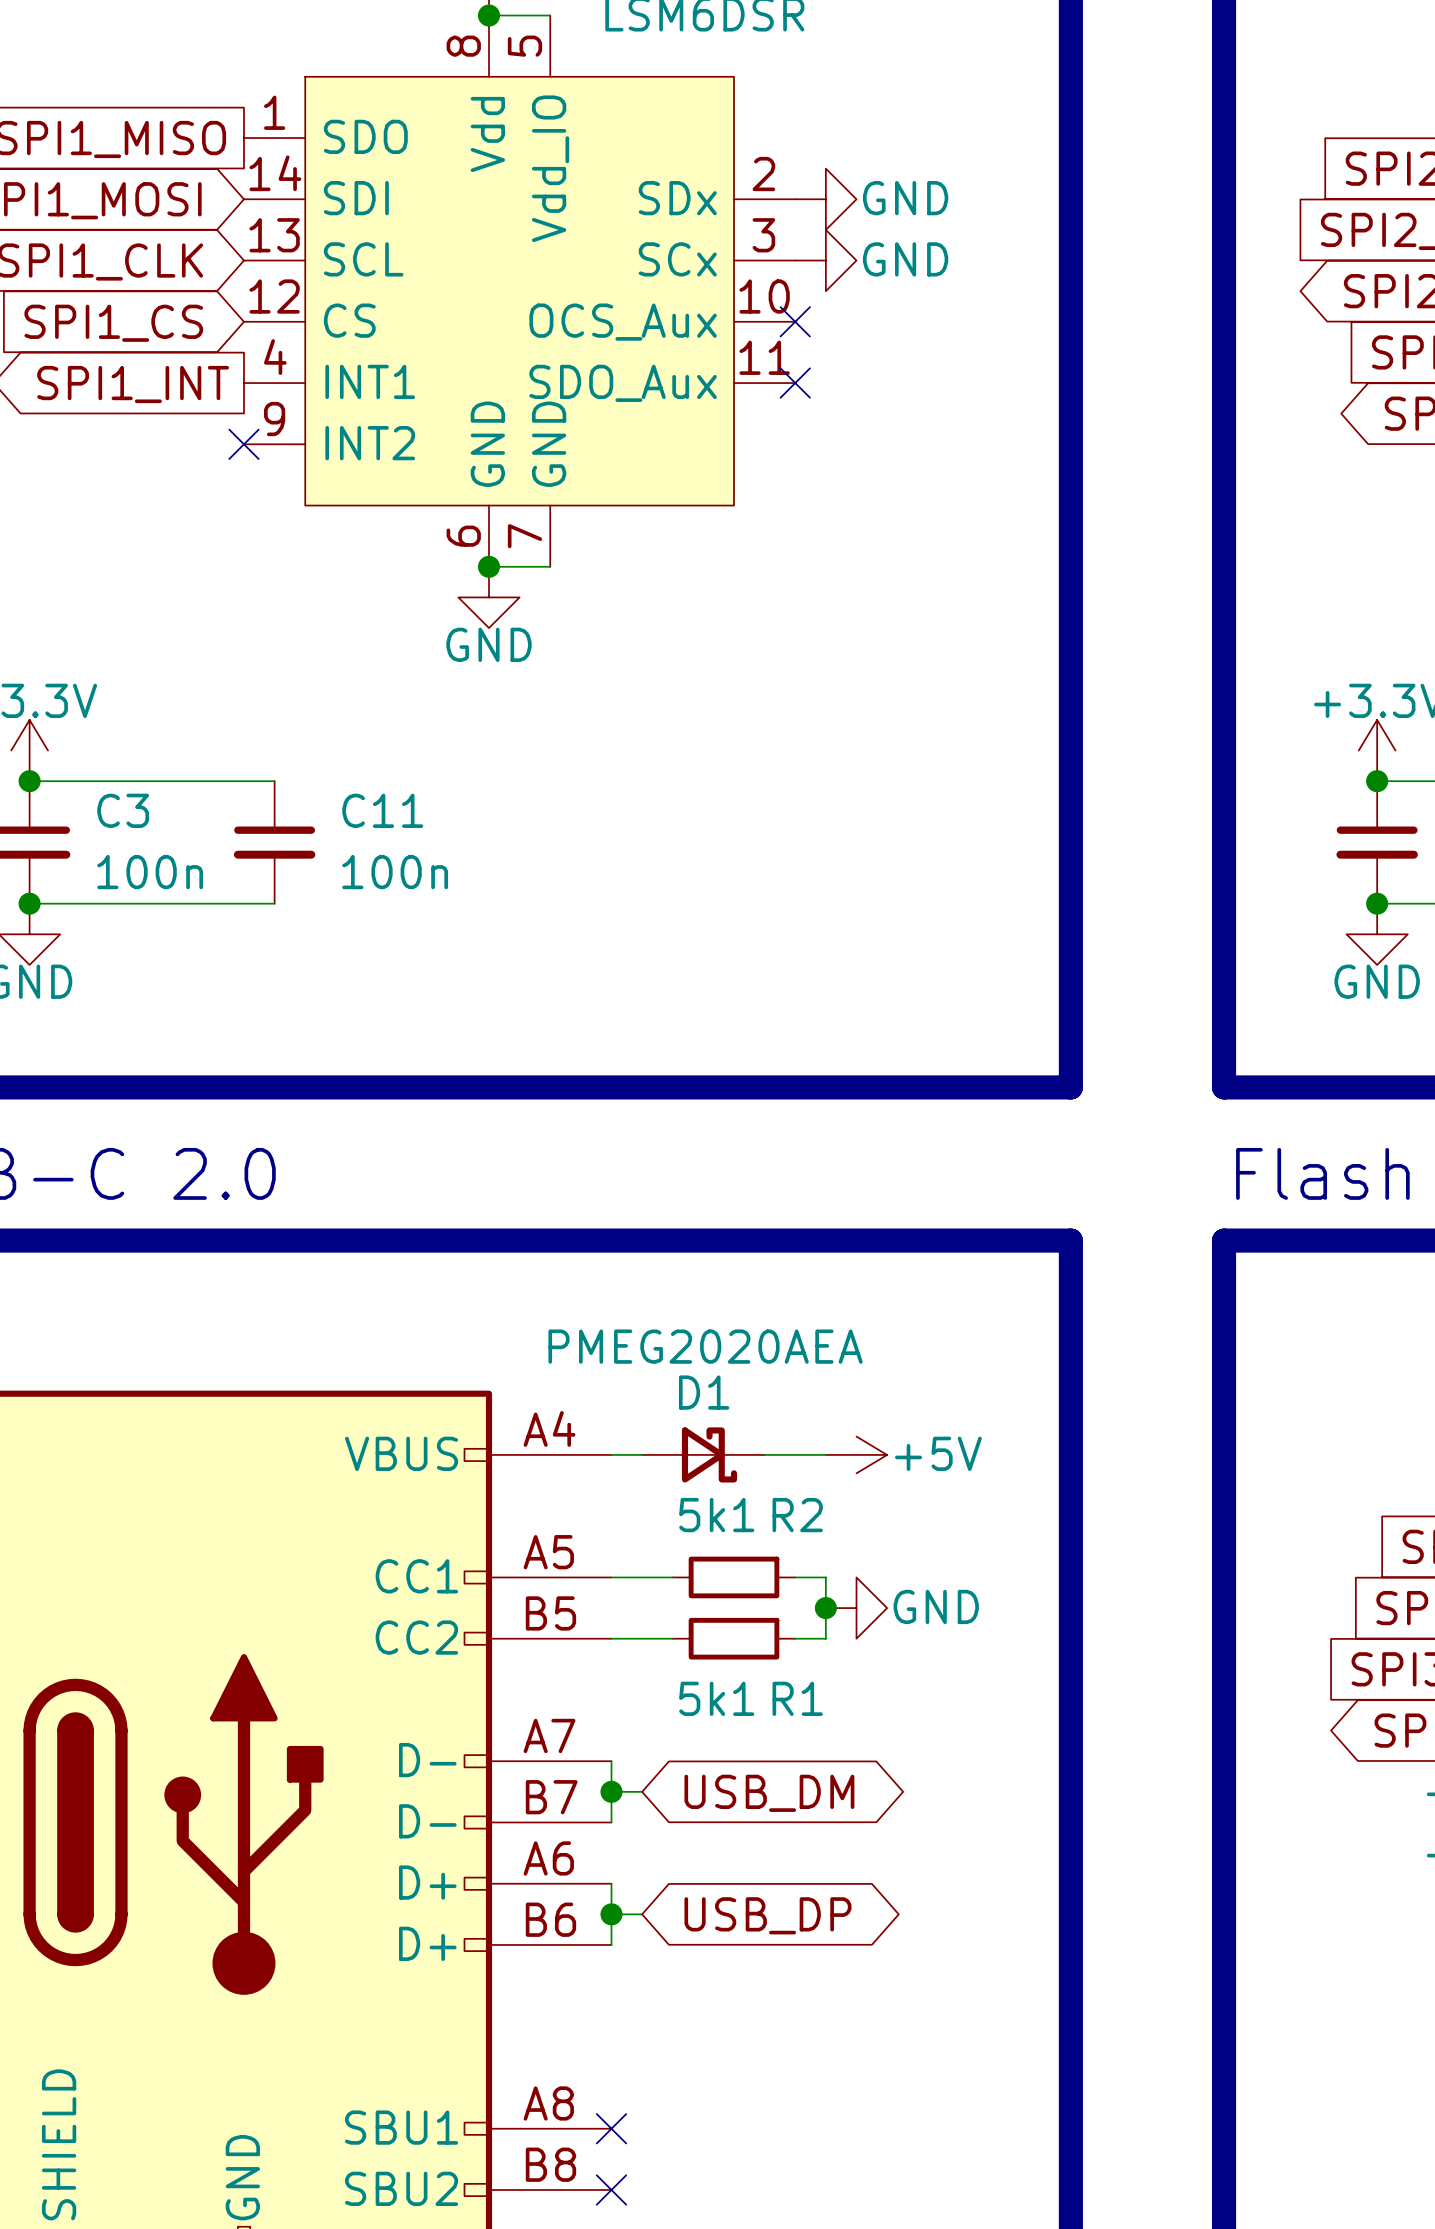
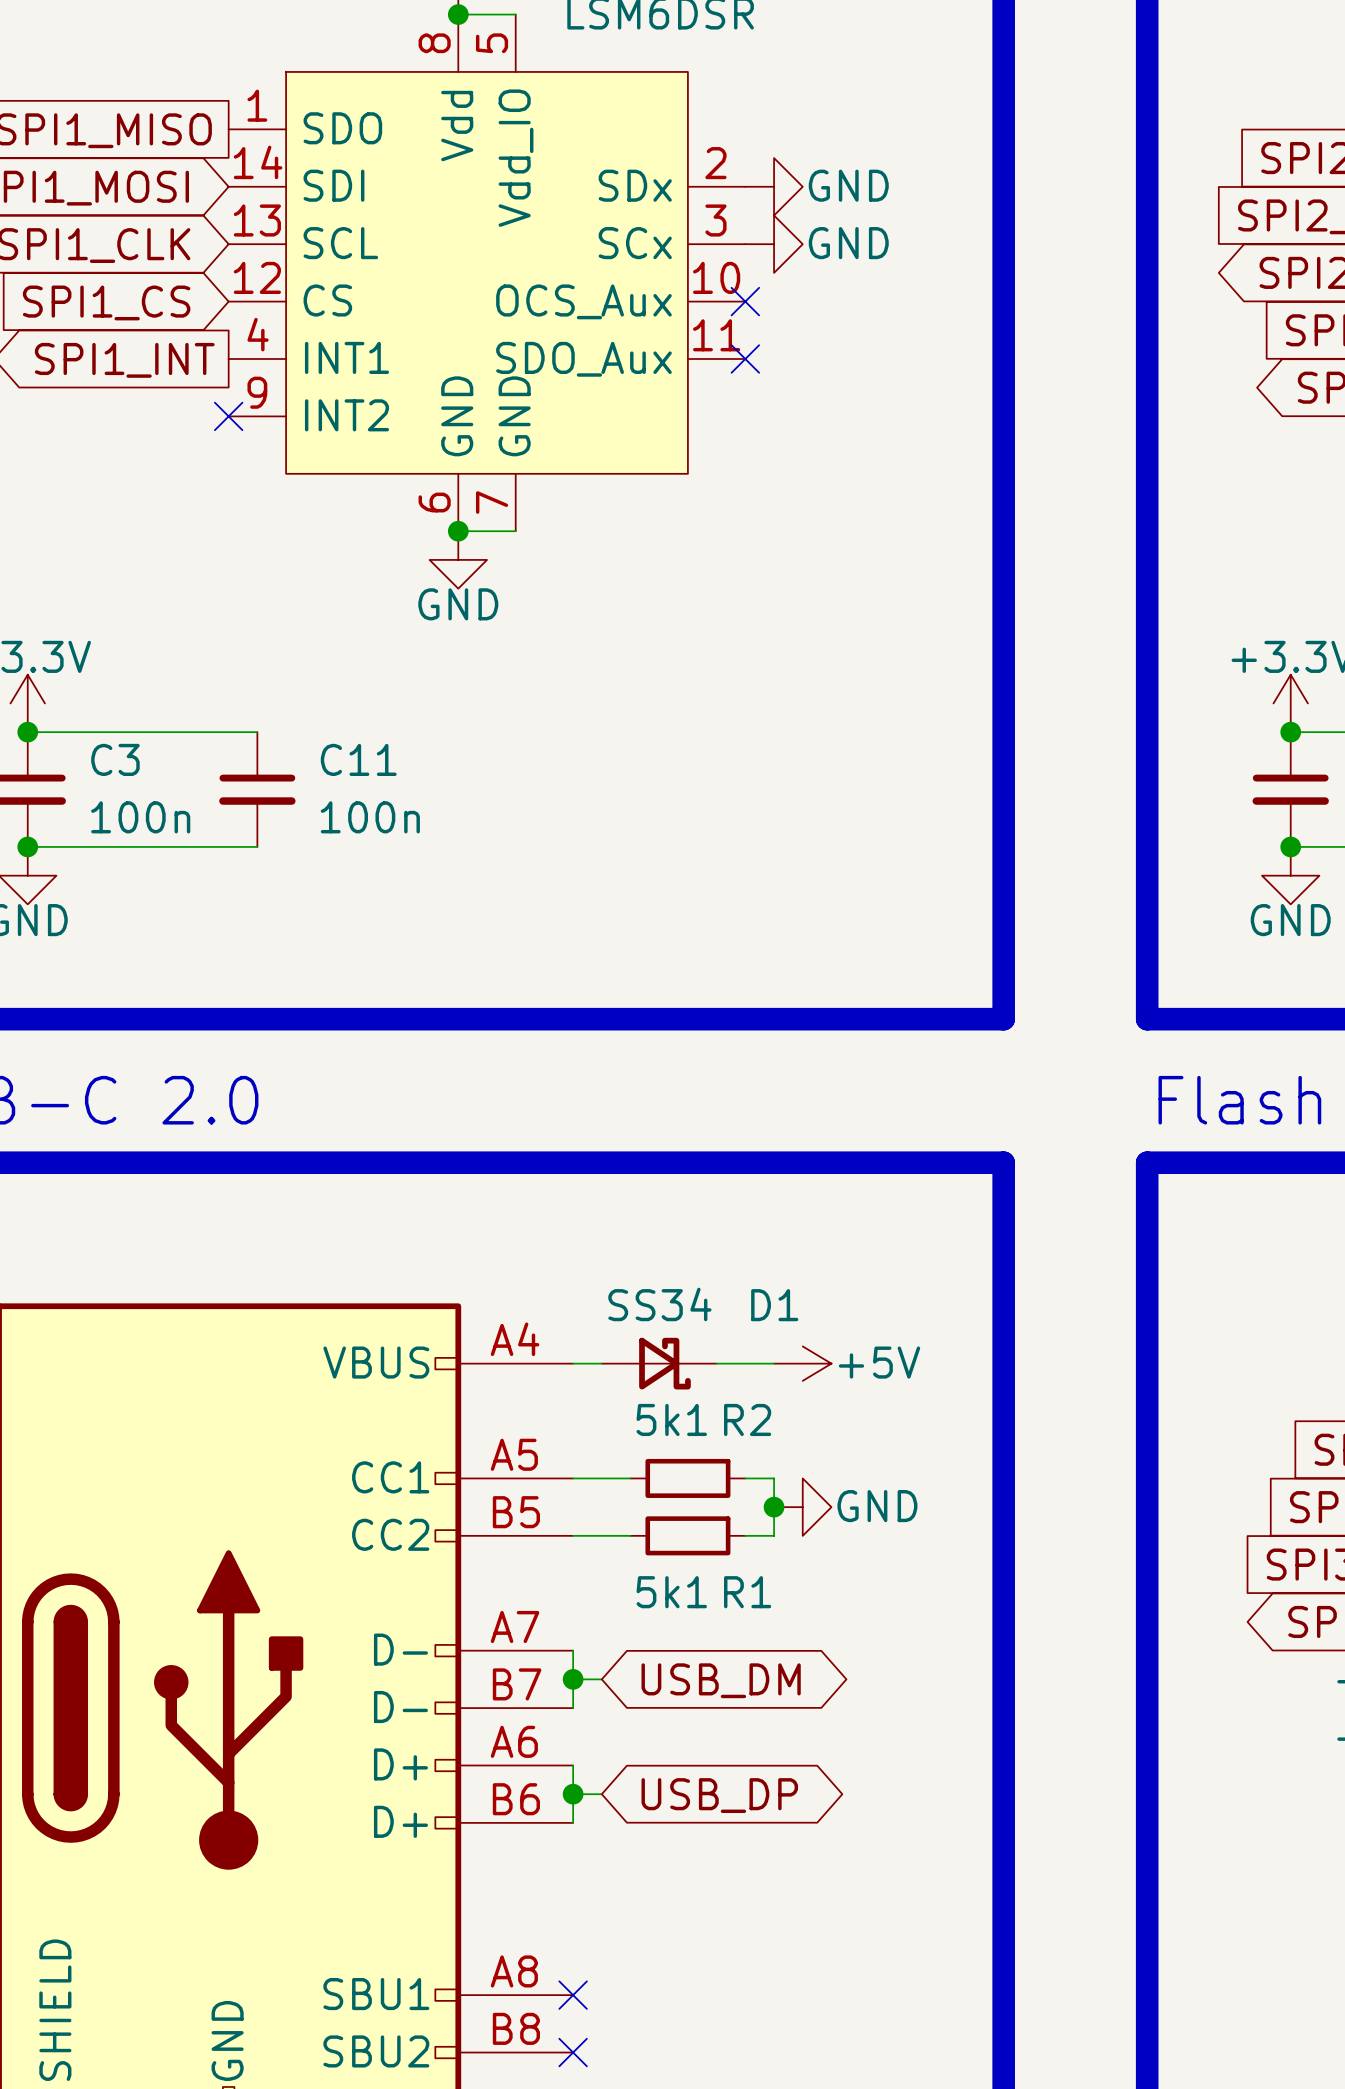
D1 value: PMEG2020AEA (705, 1346) -> SS34 (659, 1304)
D1 name position: D1 (704, 1392) -> D1 (774, 1305)

